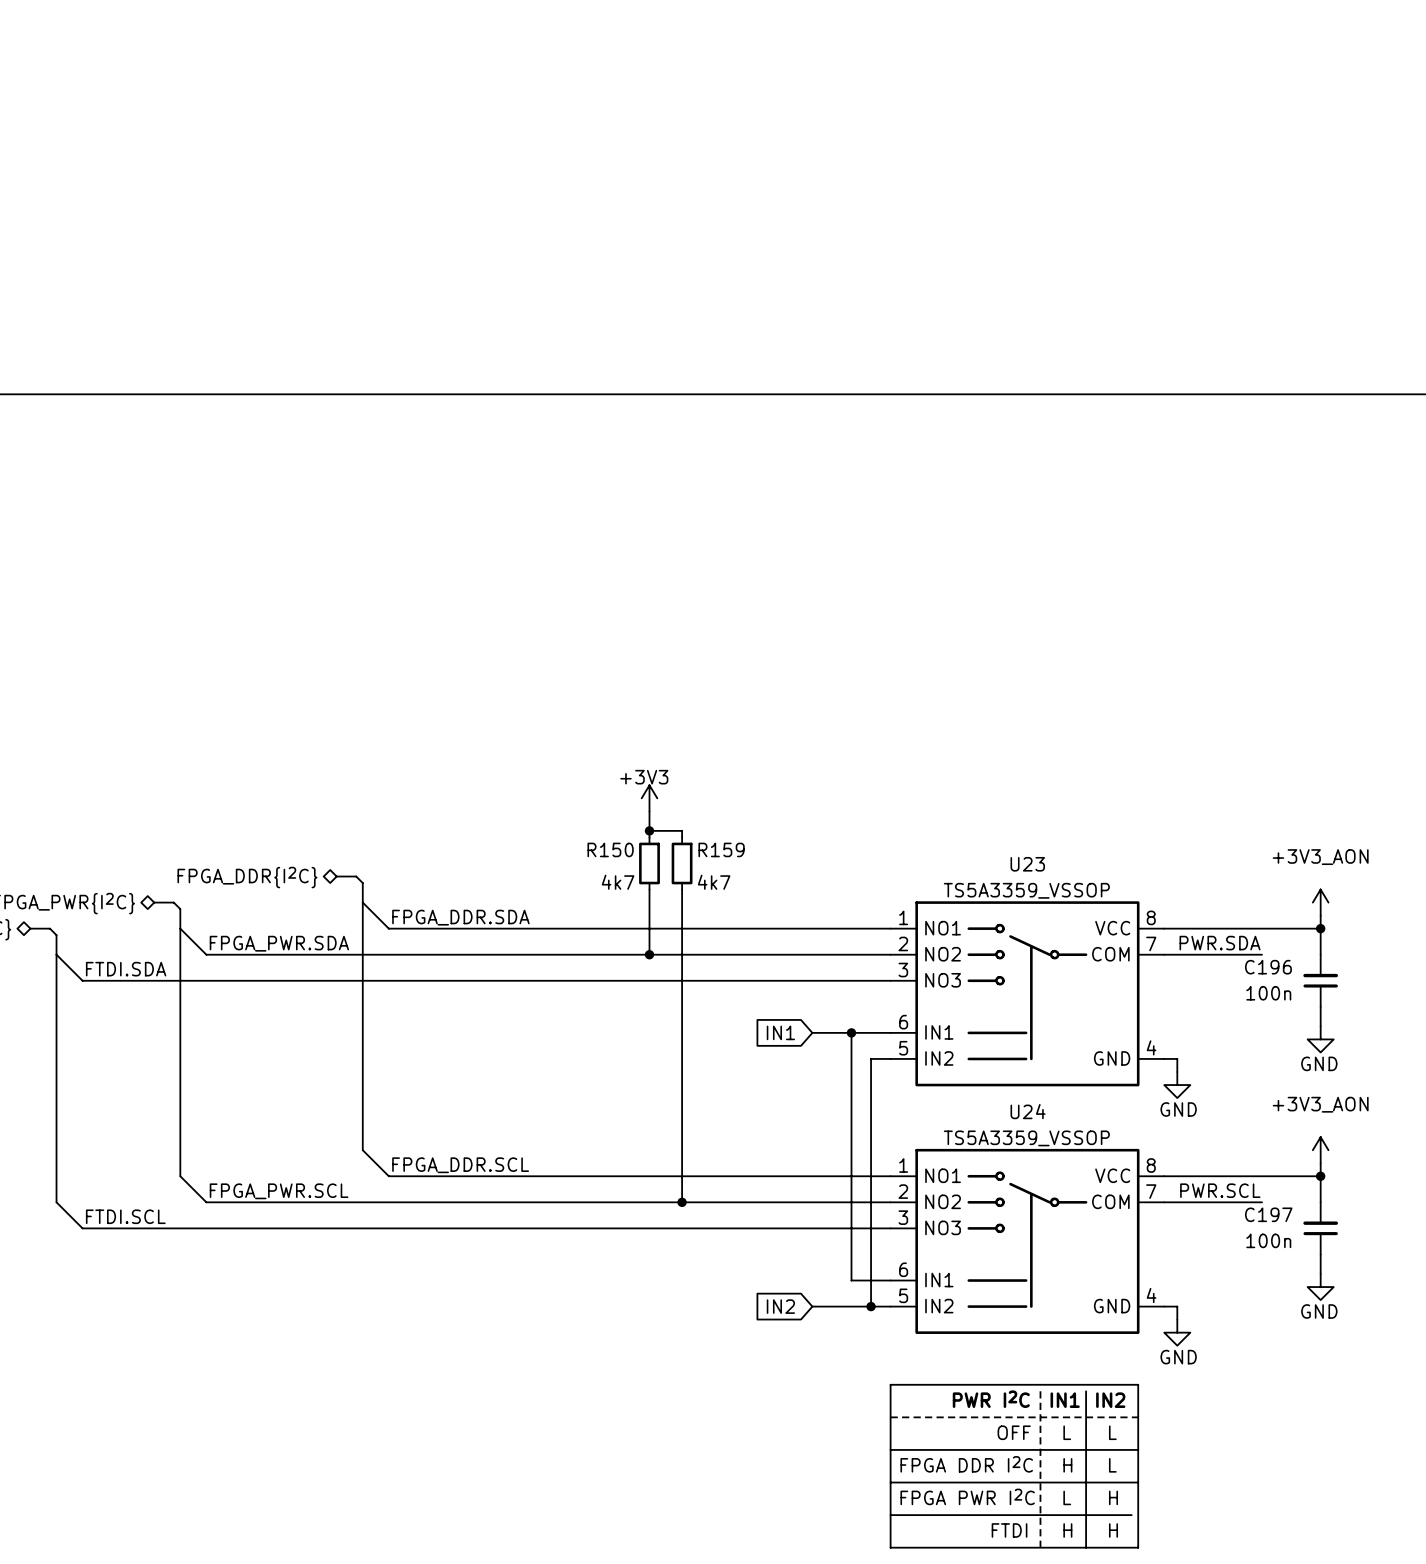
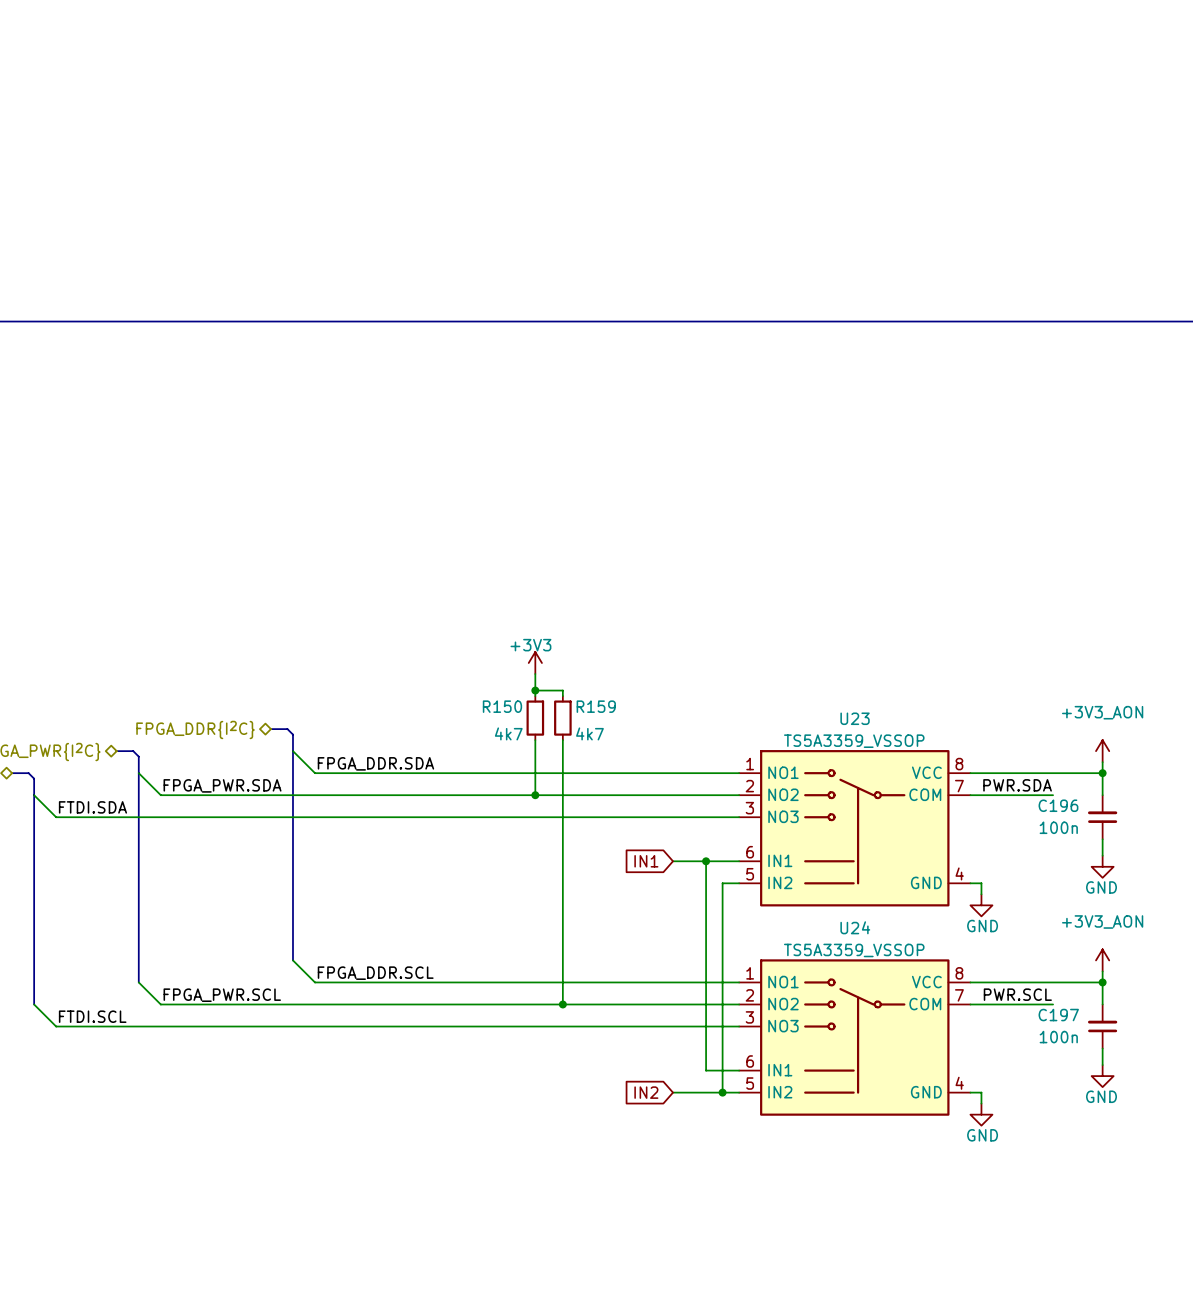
line: (890, 1384) (1138, 1384) (1138, 1547) (890, 1547) (890, 1384) -> none
line: (1040, 1391) (1040, 1547) -> none
line: (1086, 1391) (1086, 1547) -> none
text: PWR I2C (991, 1399) -> none
text: IN1 (1065, 1400) -> none
text: IN2 (1110, 1400) -> none
line: (890, 1417) (1138, 1417) -> none
text: OFF (1014, 1432) -> none
text: L (1067, 1432) -> none
text: L (1112, 1432) -> none
line: (890, 1449) (1138, 1449) -> none
text: FPGA DDR I2C (966, 1464) -> none
text: H (1067, 1465) -> none
text: L (1112, 1465) -> none
line: (890, 1482) (1138, 1482) -> none
text: FPGA PWR I2C (967, 1496) -> none
text: L (1067, 1497) -> none
text: H (1113, 1497) -> none
line: (890, 1515) (1131, 1515) -> none
text: FTDI (1009, 1530) -> none
text: H (1067, 1530) -> none
text: H (1113, 1530) -> none

